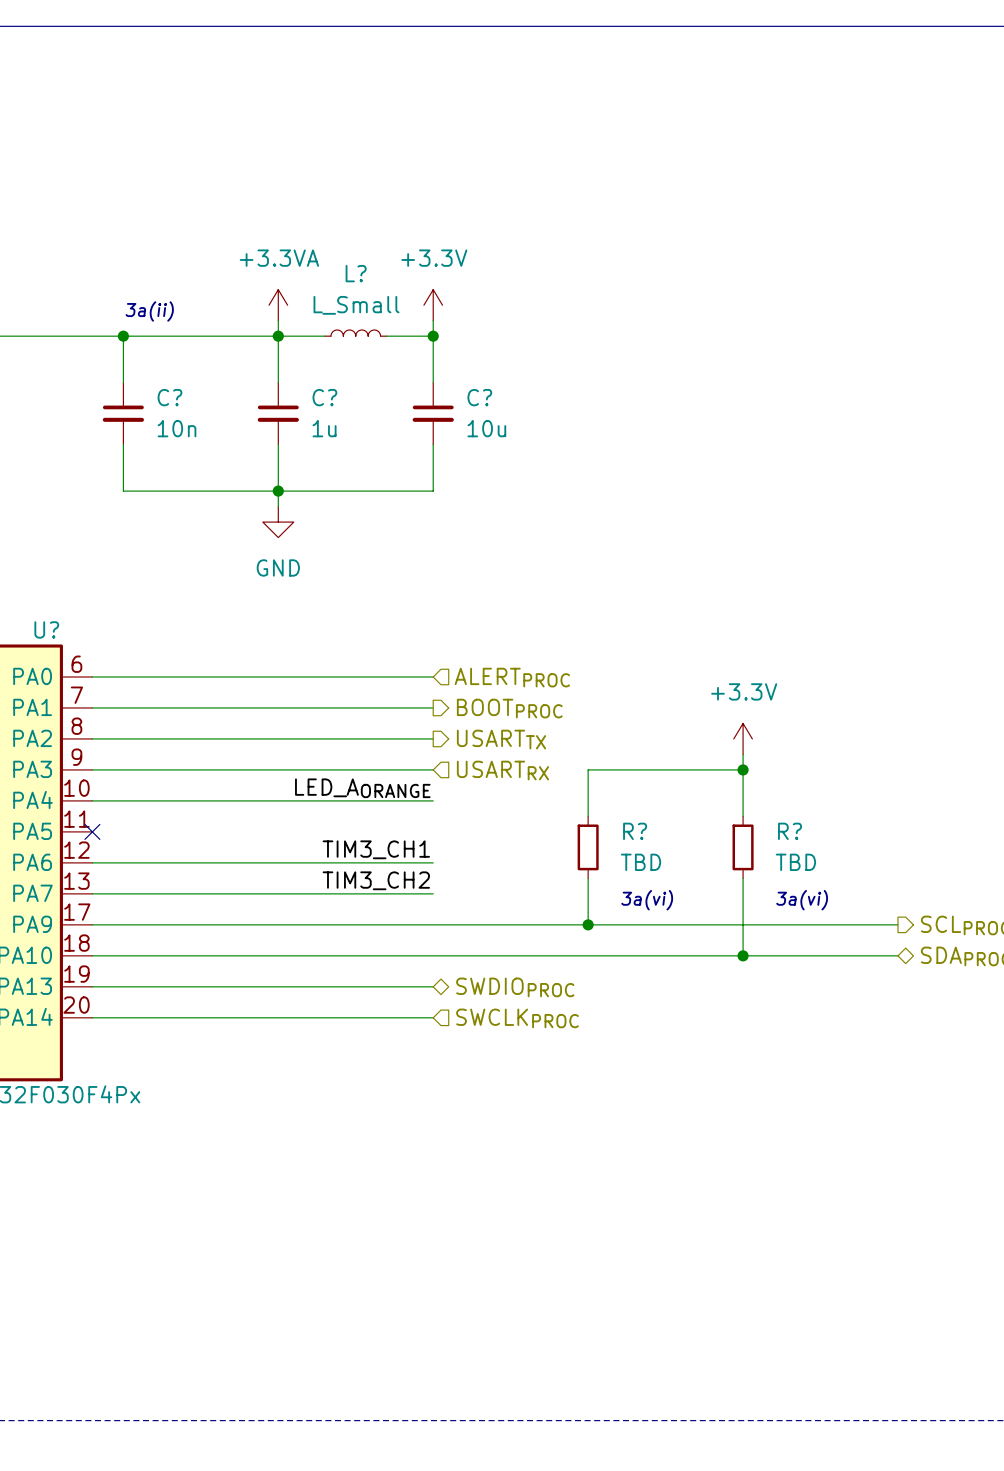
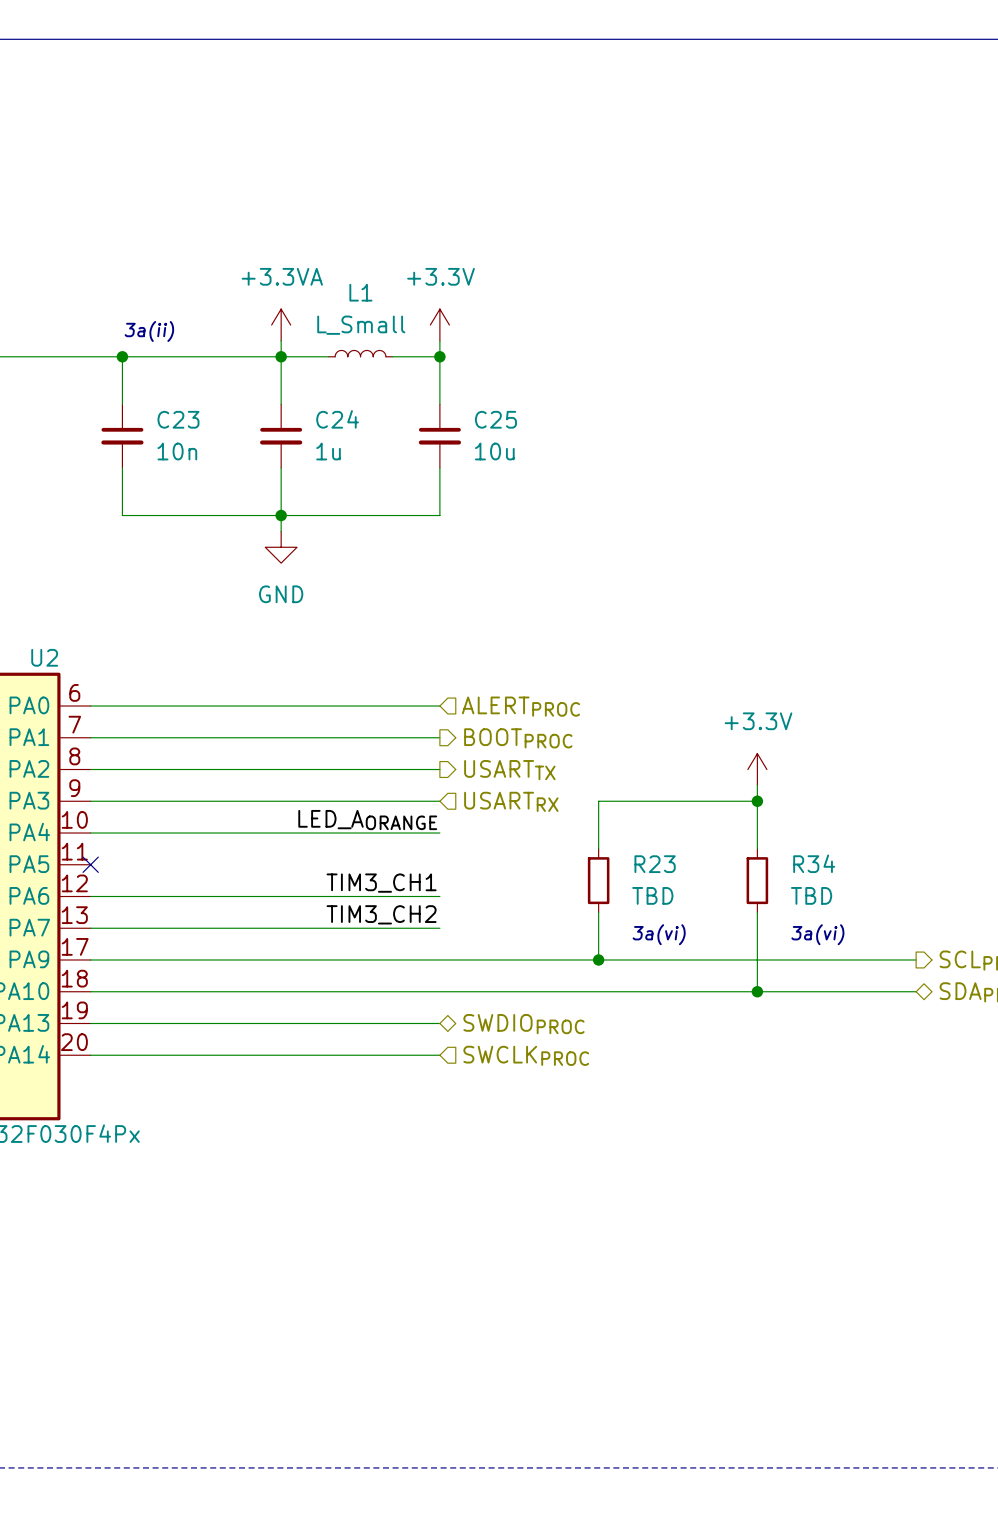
L? name: L? (356, 273) -> L1 (360, 292)
C? name: C? (169, 397) -> C23 (178, 419)
C? name: C? (324, 397) -> C24 (337, 419)
C? name: C? (479, 397) -> C25 (495, 419)
U? name: U? (46, 629) -> U2 (44, 657)
R? name: R? (635, 831) -> R23 (655, 864)
R? name: R? (790, 831) -> R34 (814, 863)

